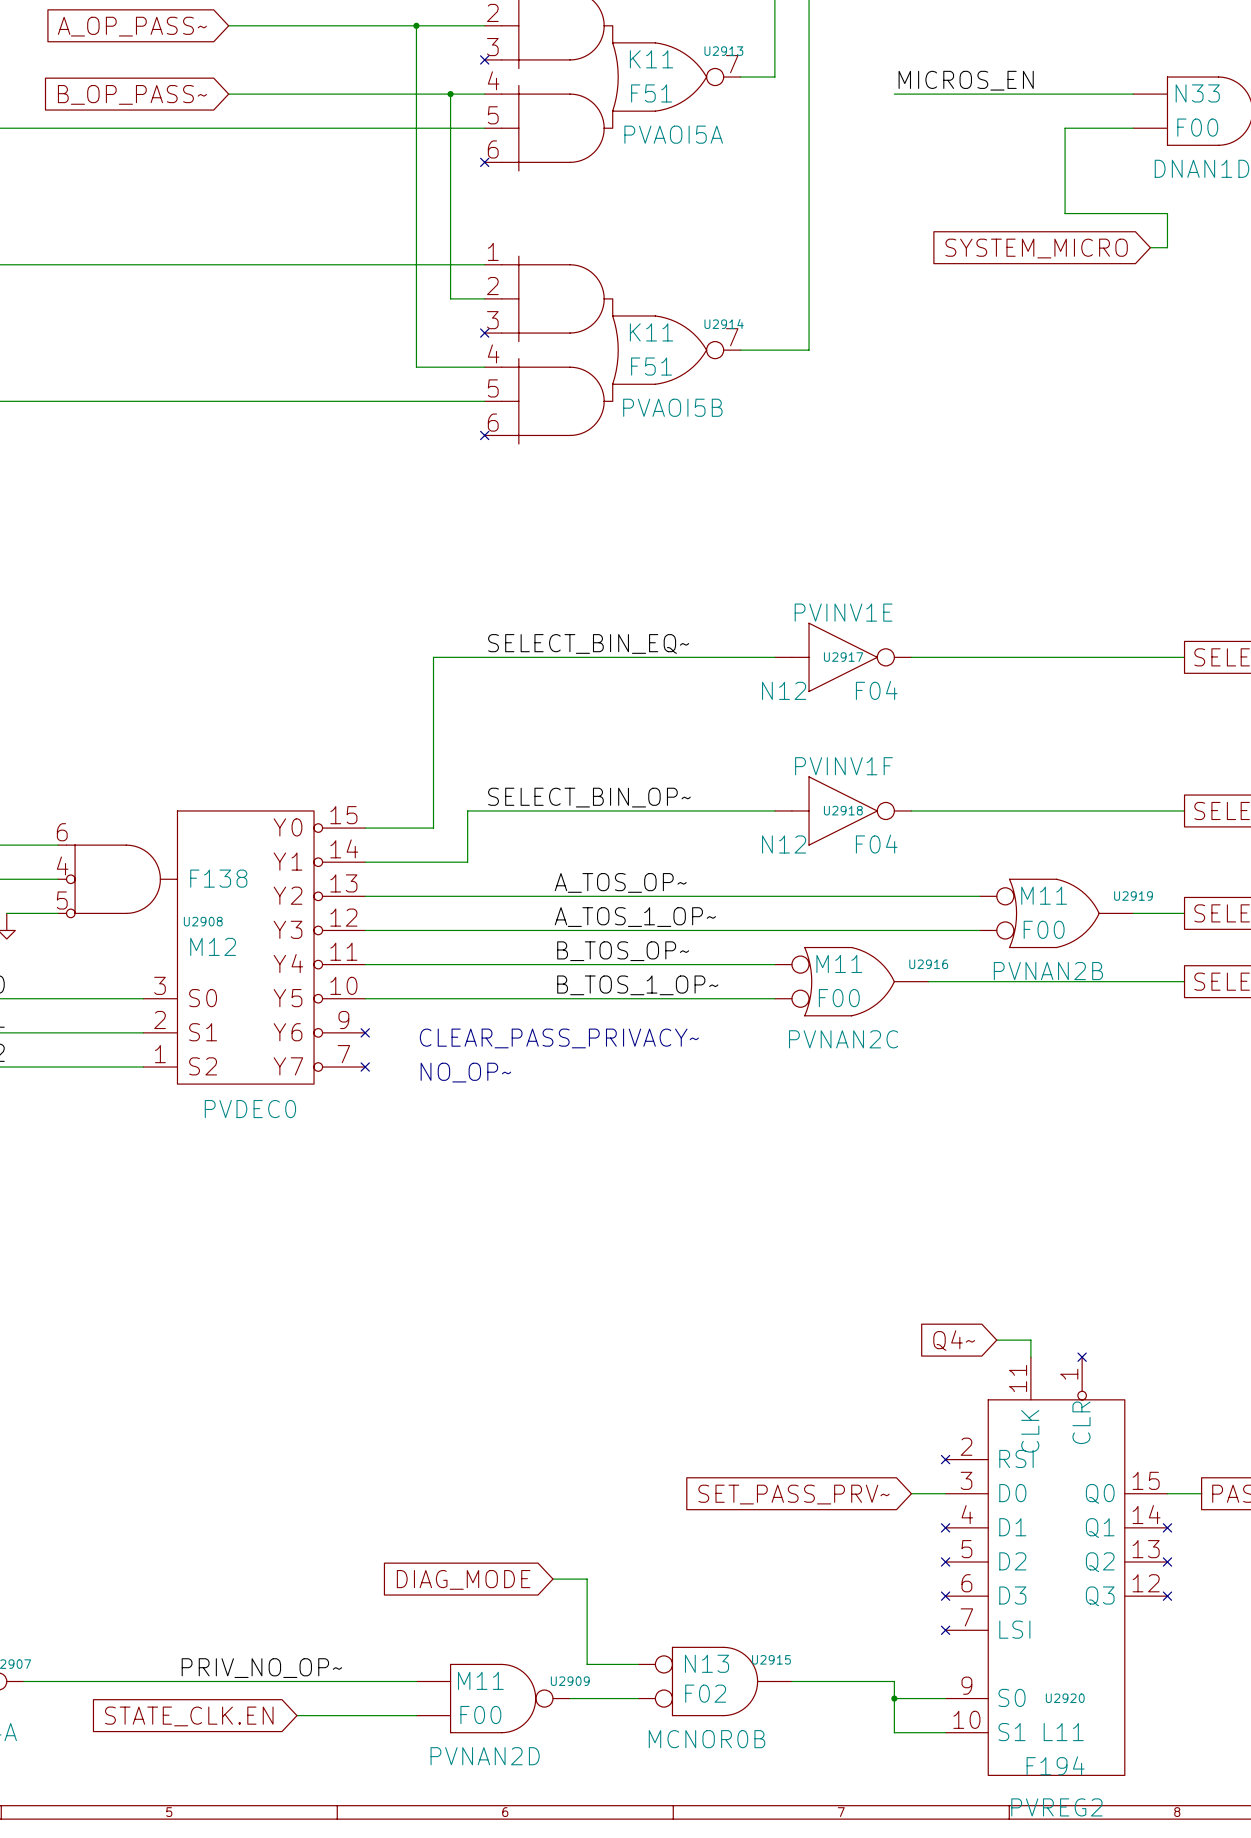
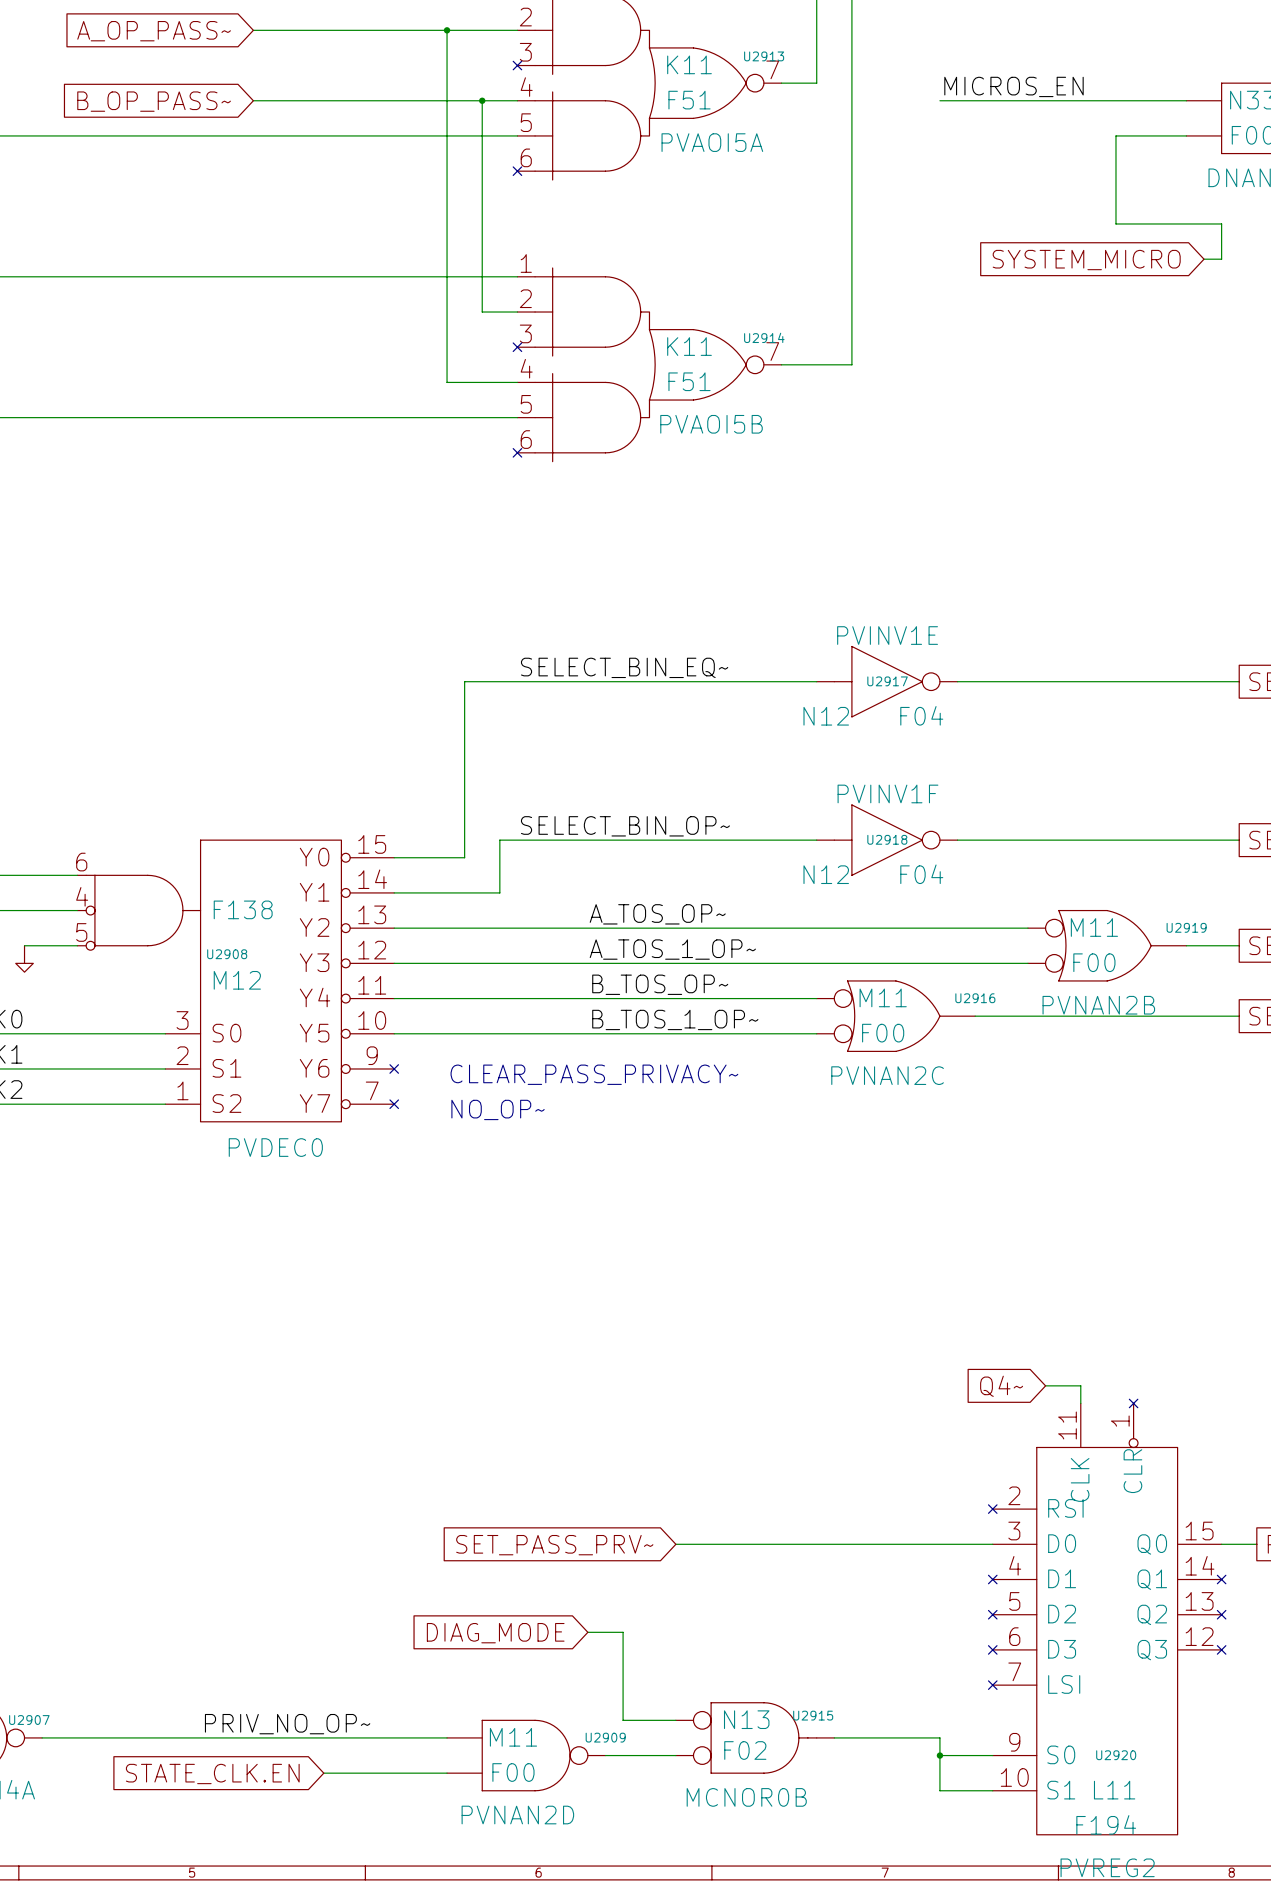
wire: none -> (675, 1544) (957, 1544)
global label: none -> SET_PASS_PRV~ (554, 1545)
global label: SET_PASS_PRV~ (794, 1494) -> none

